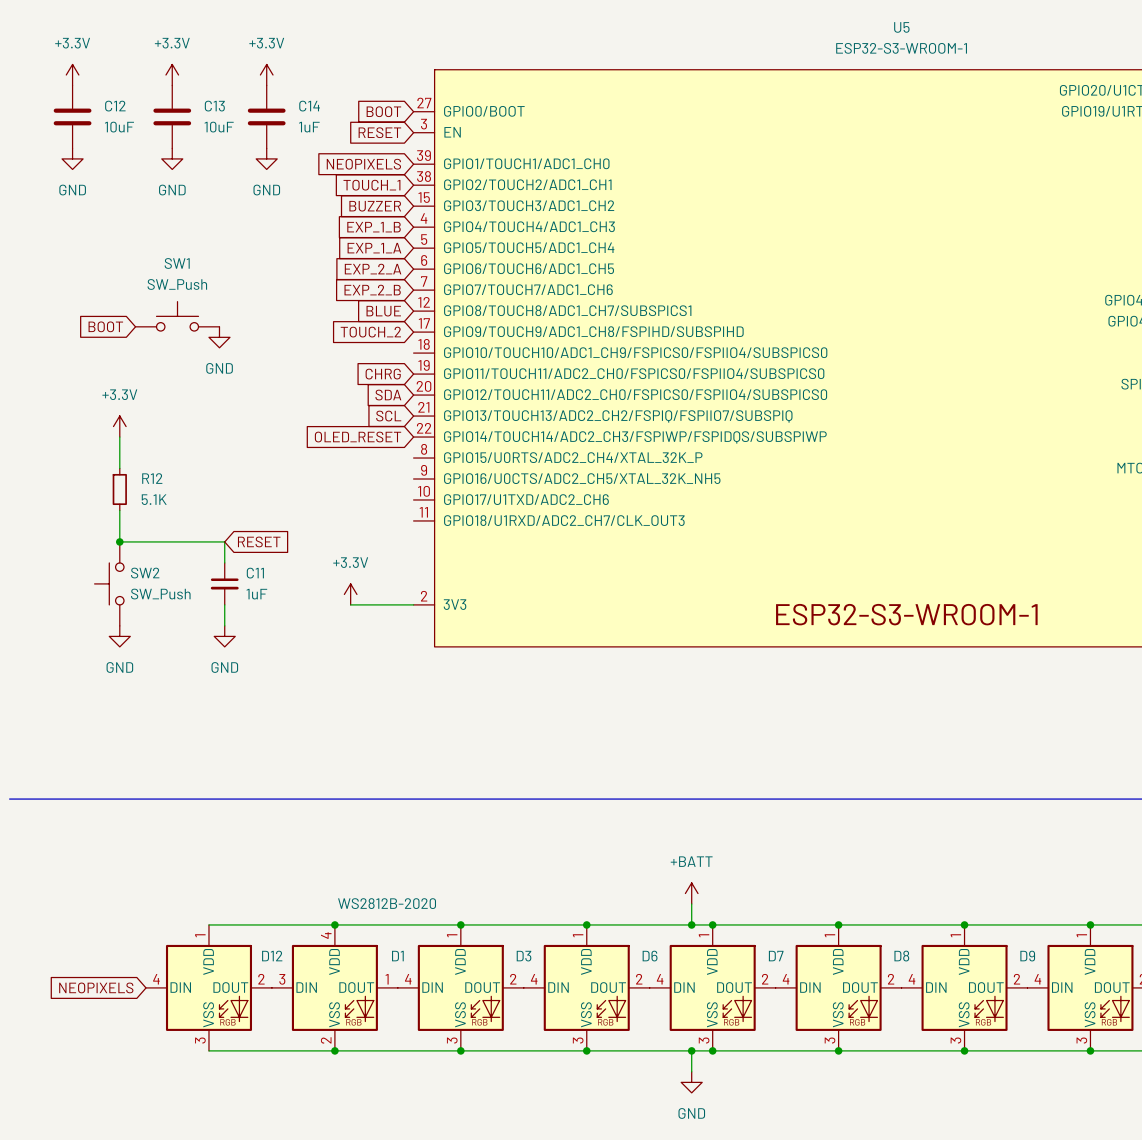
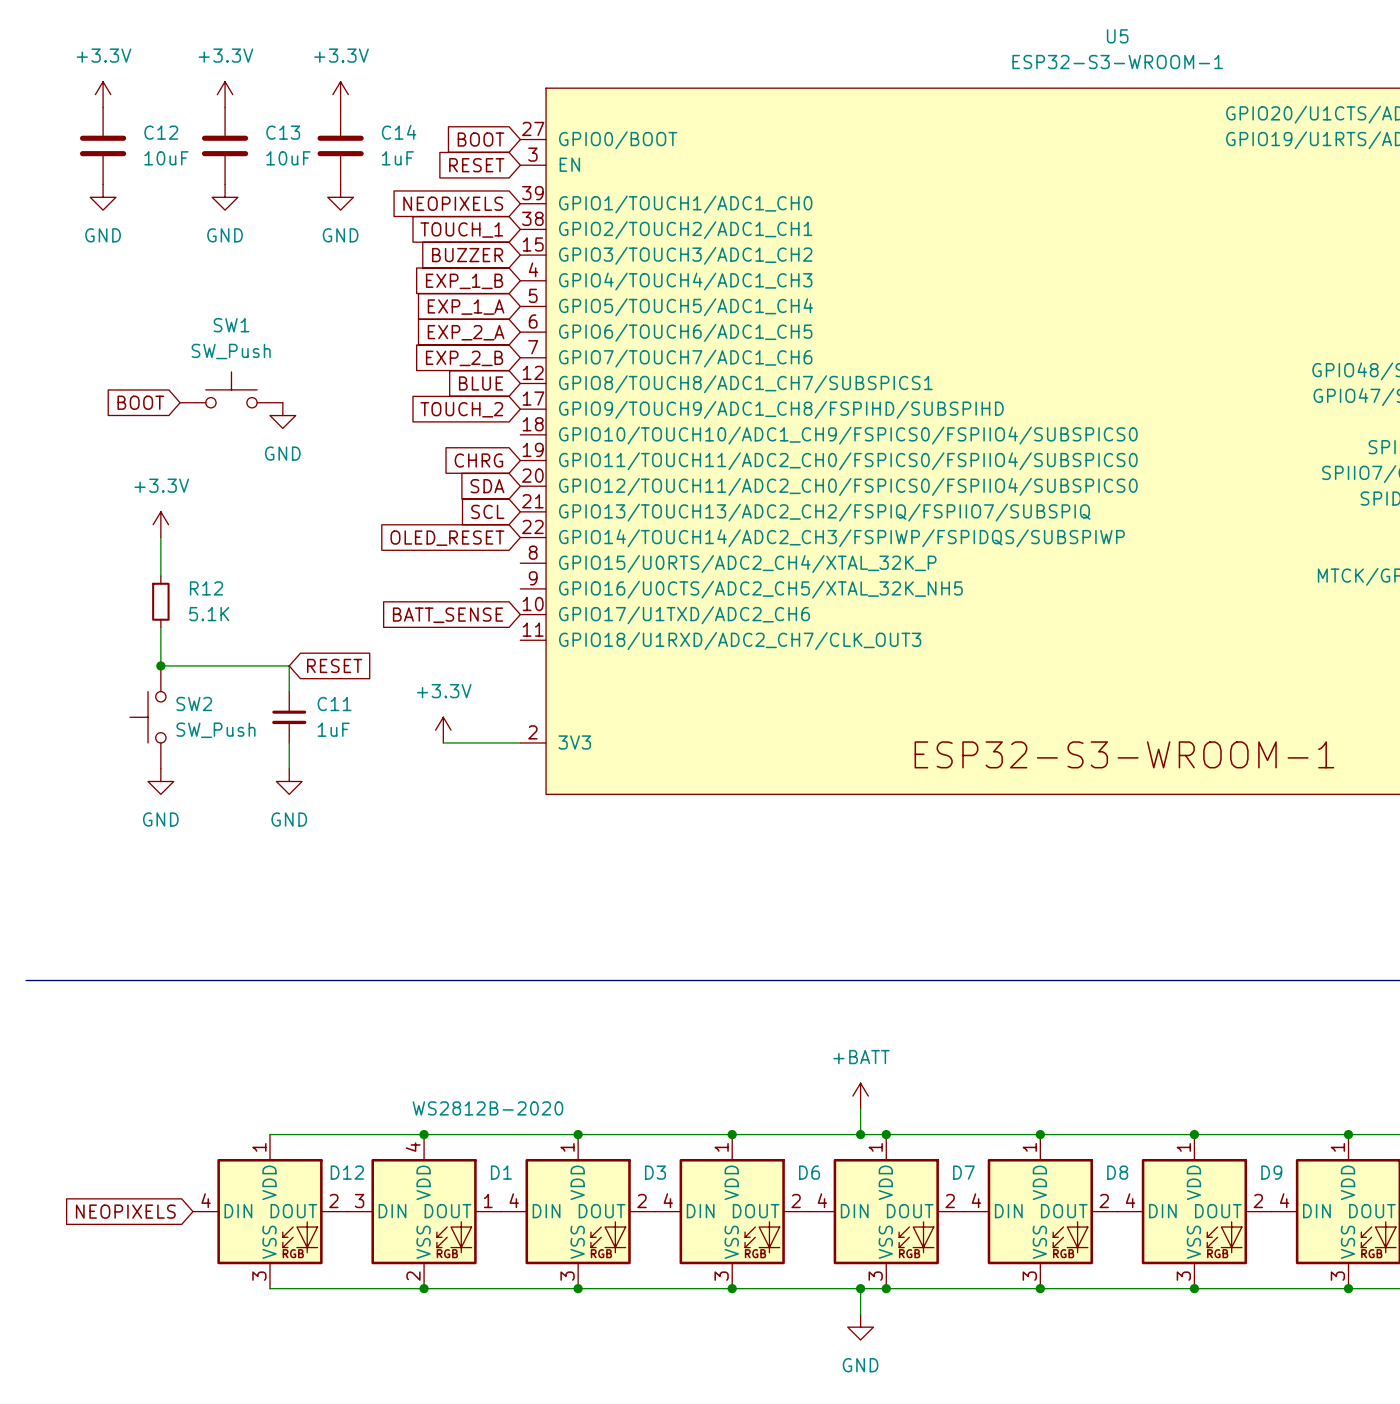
global label: none -> BATT_SENSE (448, 615)

